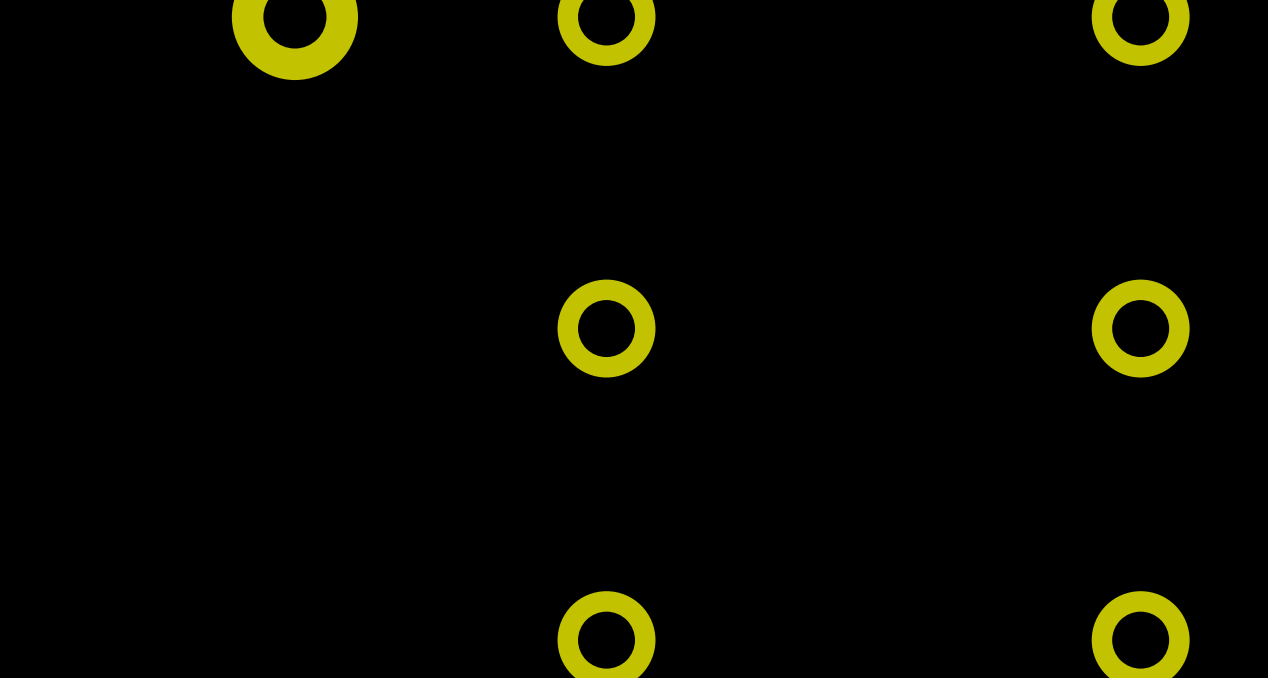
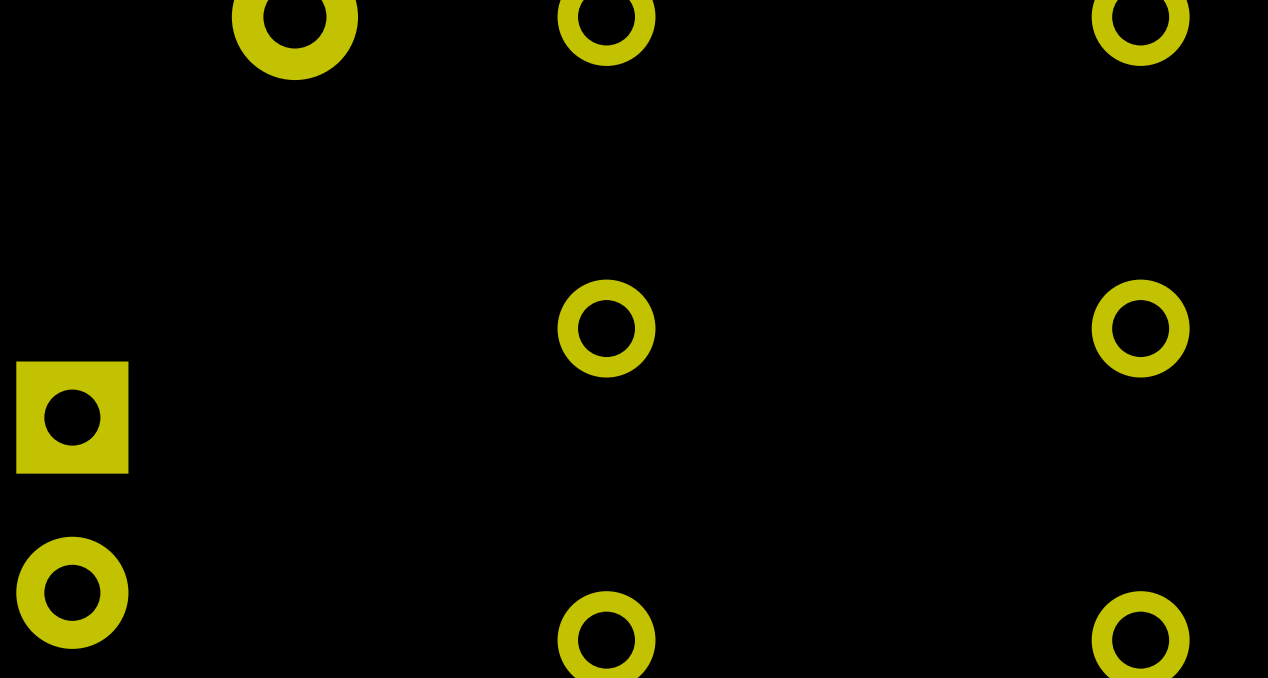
part: none -> (72, 505)

